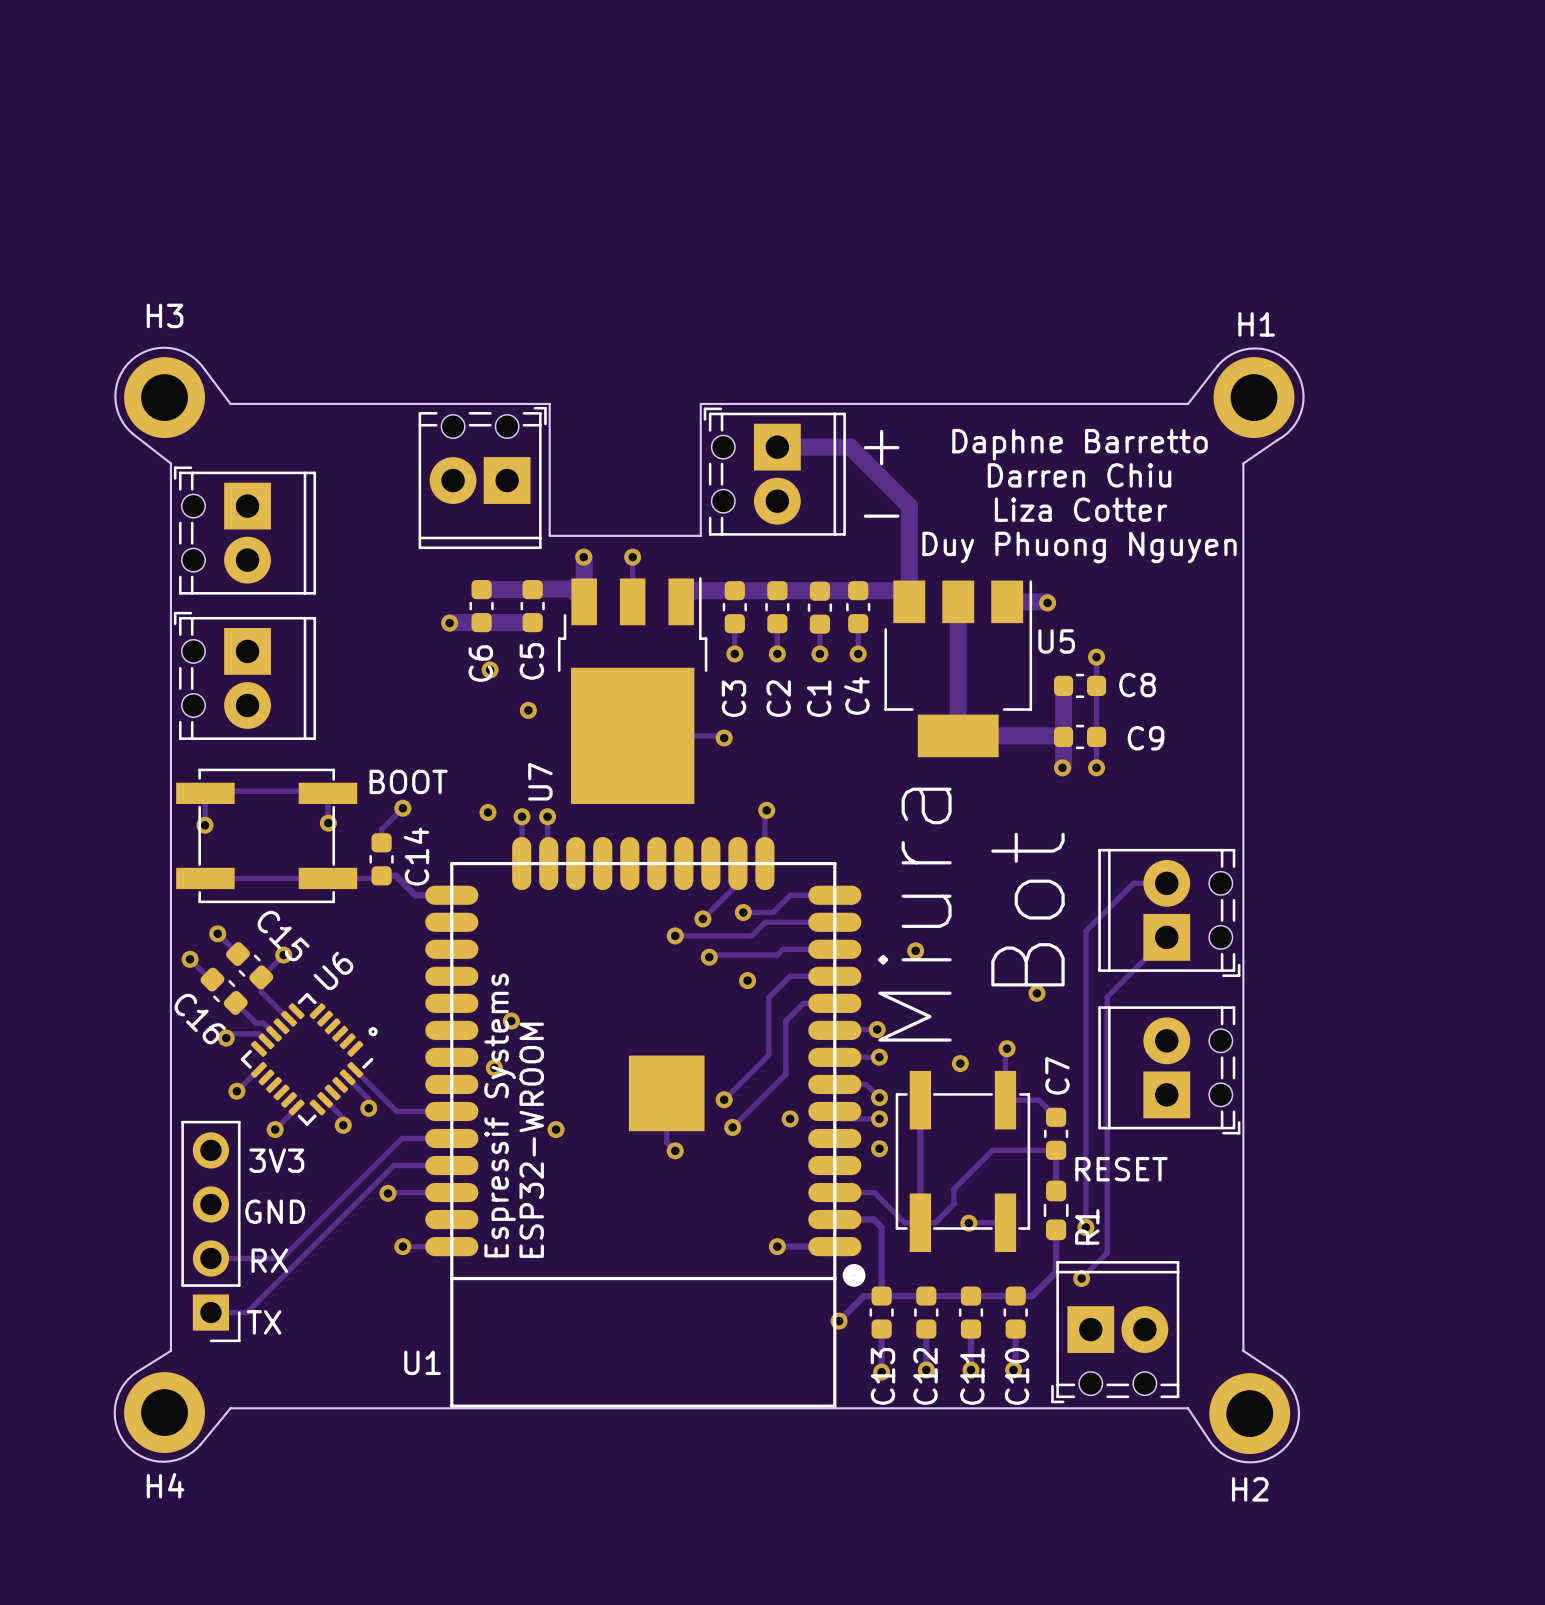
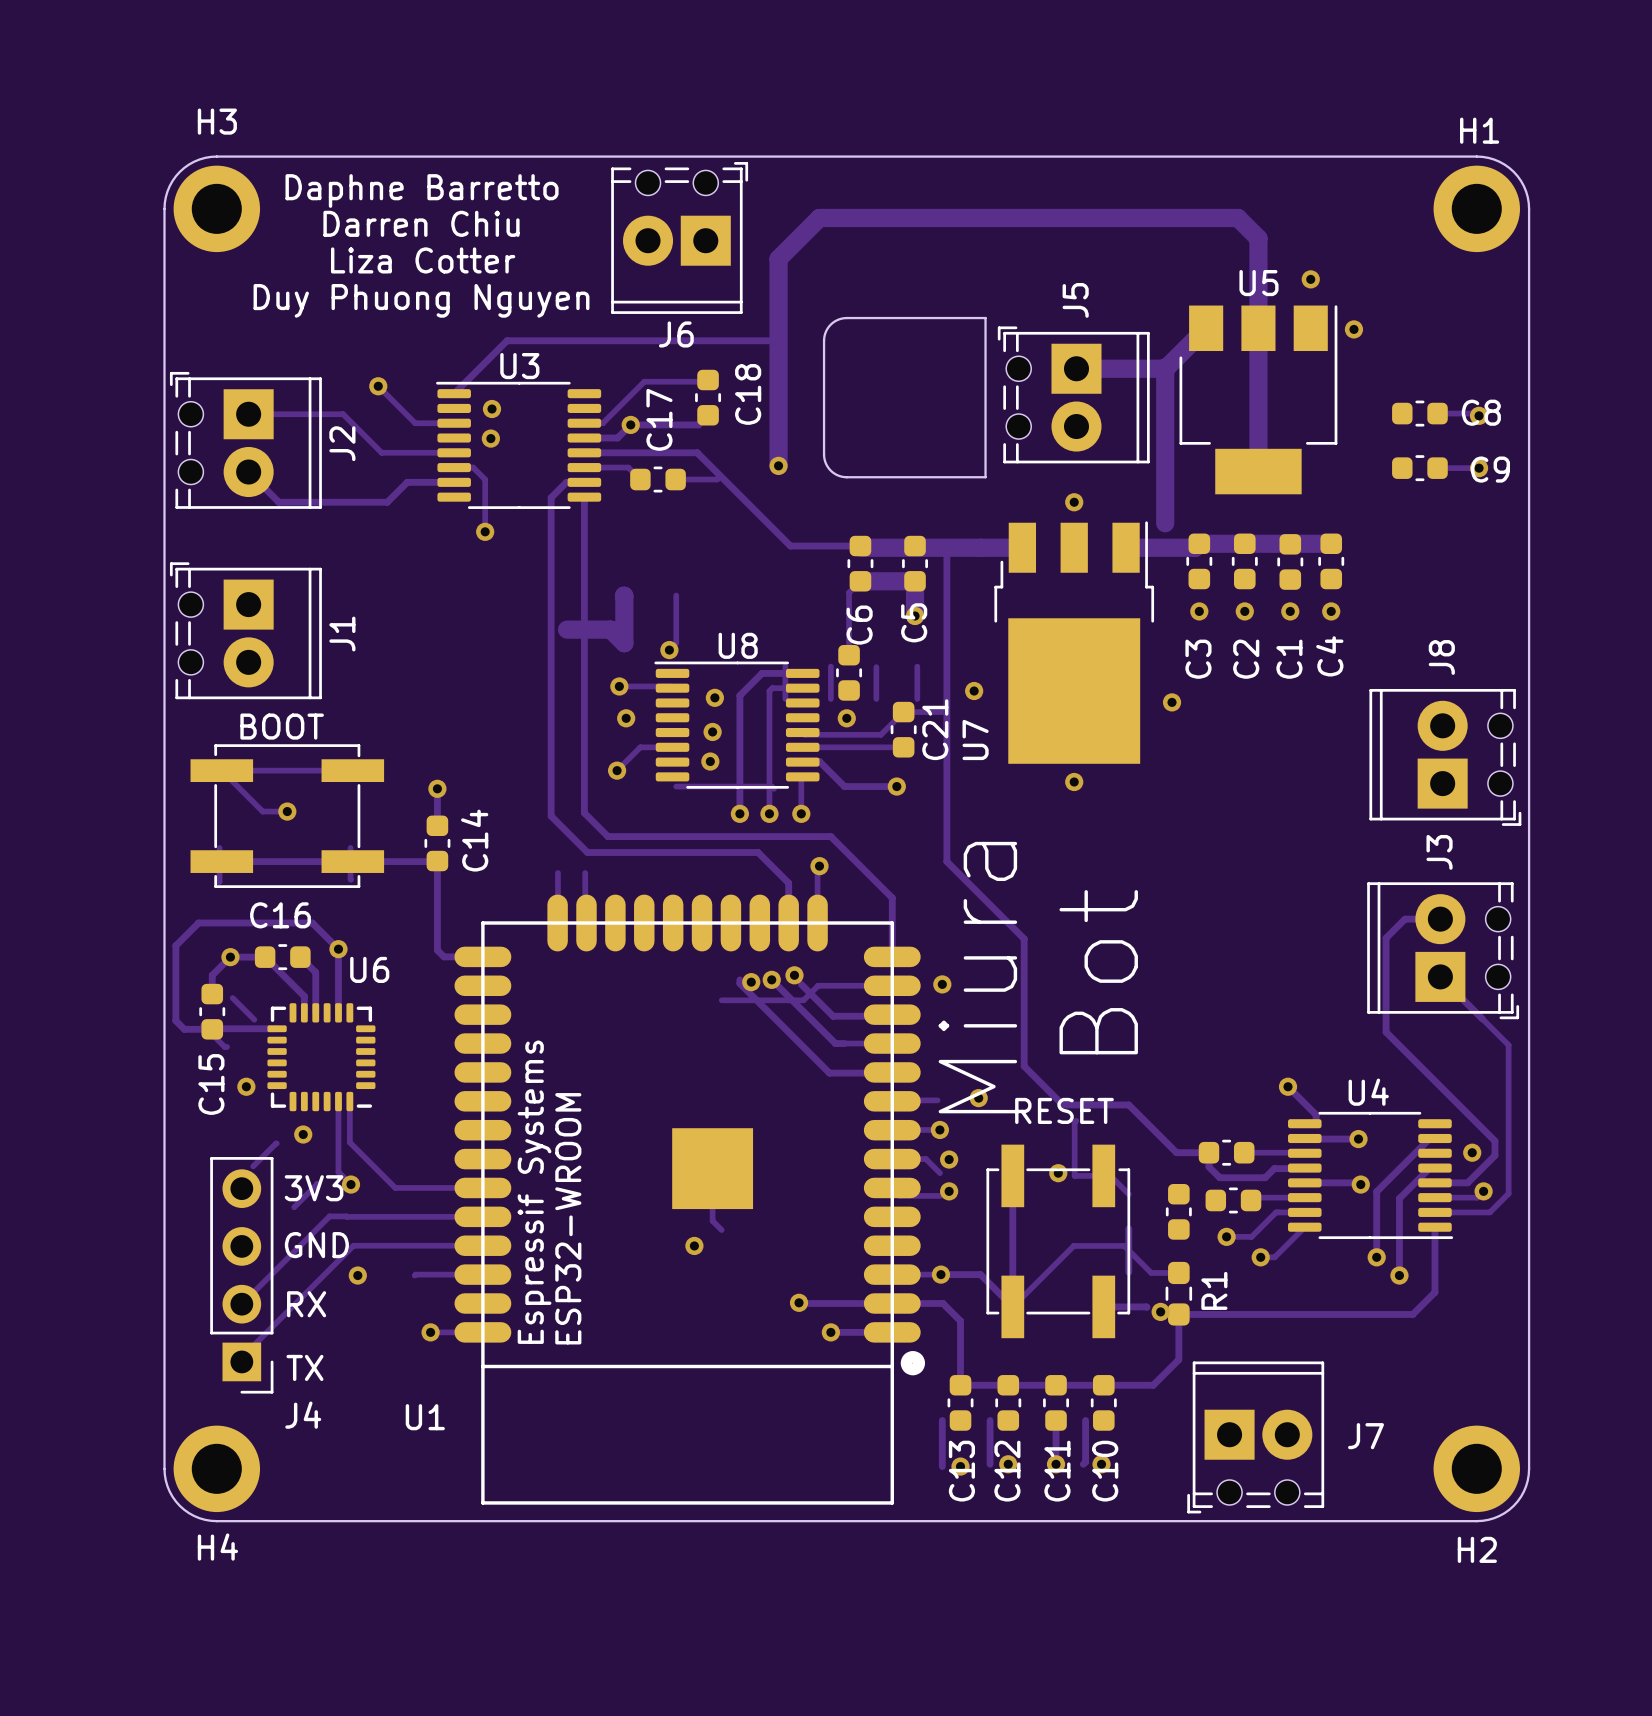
text: none -> Daphne Barretto (422, 191)
text: none -> Darren Chiu (421, 223)
J6: none -> (679, 237)
text: none -> Liza Cotter (423, 260)
via: none -> (1310, 279)
text: none -> Duy Phuong Nguyen (421, 300)
board edge: none -> (846, 318) (985, 318) (985, 477) (846, 477) (836, 474) (829, 468) (824, 454) (824, 338) (830, 324) (836, 320) (846, 318)
track: none -> (1206, 328) (1165, 368) (1076, 368)
via: none -> (1353, 329)
track: none -> (778, 343) (776, 340) (507, 340) (454, 393)
track: none -> (1165, 367) (1165, 523)
track: none -> (708, 380) (706, 381) (644, 381) (602, 423) (584, 423)
track: none -> (378, 386) (415, 423) (454, 423)
via: none -> (378, 386)
board edge: (1217, 365) (1188, 403) (700, 403) (700, 535) (549, 535) (549, 403) (230, 403) (201, 365) (182, 351) (158, 348) (147, 350) (131, 359) (123, 368) (116, 385) (115, 402) (118, 414) (132, 433) (170, 463) (170, 1350) (132, 1375) (118, 1394) (114, 1418) (120, 1435) (126, 1445) (135, 1453) (152, 1460) (169, 1461) (181, 1458) (196, 1448) (230, 1408) (1188, 1408) (1212, 1445) (1232, 1458) (1243, 1461) (1261, 1461) (1282, 1450) (1290, 1441) (1297, 1424) (1298, 1413) (1295, 1395) (1281, 1376) (1243, 1350) (1243, 463) (1291, 428) (1300, 412) (1303, 394) (1299, 377) (1292, 366) (1284, 358) (1273, 352) (1255, 348) (1243, 349) (1232, 354) (1217, 365) -> (216, 156) (199, 159) (179, 171) (167, 191) (164, 208) (164, 1468) (167, 1486) (179, 1505) (194, 1515) (216, 1521) (1476, 1521) (1494, 1518) (1513, 1505) (1526, 1486) (1529, 1468) (1529, 208) (1523, 186) (1513, 171) (1494, 159) (1476, 156) (216, 156)
J5: none -> (1073, 394)
C18: none -> (708, 397)
via: none -> (492, 409)
track: none -> (1439, 413) (1476, 413) (1479, 415)
track: none -> (248, 414) (343, 414) (381, 452) (454, 452)
track: none -> (708, 415) (698, 424) (630, 424) (617, 438) (584, 438)
via: none -> (1479, 415)
H3 position: (164, 397) -> (216, 208)
via: none -> (630, 424)
H1 position: (1254, 397) -> (1476, 208)
via: none -> (490, 438)
J2: none -> (245, 440)
U3: none -> (518, 445)
track: none -> (584, 452) (697, 452) (790, 546) (860, 546)
track: none -> (778, 465) (778, 258) (819, 217) (1237, 217) (1258, 238) (1258, 471)
via: none -> (778, 465)
track: none -> (454, 467) (473, 467) (485, 479) (485, 531)
track: none -> (584, 467) (628, 467) (640, 479)
track: none -> (1437, 468) (1479, 468)
via: none -> (1479, 468)
track: none -> (248, 472) (278, 502) (387, 502) (407, 482) (453, 481)
text: Daphne Barretto (1080, 444) -> none
track: none -> (720, 476) (717, 479) (675, 479)
track: (777, 447) (850, 447) (909, 506) (909, 601) (898, 590) (692, 590) (681, 601) -> none
text: + (881, 447) -> none
C17: none -> (658, 479)
via: none -> (1074, 502)
part: (774, 471) -> none
text: Darren Chiu (1079, 475) -> none
part: (482, 478) -> none
via: none -> (485, 531)
track: none -> (1331, 543) (1199, 543) (1195, 547) (1126, 547)
text: Liza Cotter (1081, 509) -> none
track: none -> (860, 546) (862, 547) (1022, 547)
track: none -> (946, 547) (940, 547) (946, 554) (946, 861) (1024, 938) (1024, 1066) (1062, 1104) (1128, 1104) (1176, 1152) (1208, 1152) (1208, 1166) (1219, 1177) (1265, 1177) (1274, 1168) (1304, 1168)
text: - (881, 516) -> none
part: (244, 530) -> none
text: Duy Phuong Nguyen (1079, 547) -> none
via: (583, 557) -> none
via: (632, 557) -> none
via: none -> (1199, 611)
via: none -> (1244, 611)
via: none -> (1290, 611)
via: none -> (1331, 611)
track: none -> (915, 615) (915, 581) (860, 581) (849, 592) (849, 655)
via: none -> (915, 615)
track: (481, 589) (532, 589) -> none
J1: none -> (245, 630)
track: (958, 601) (958, 735) (1063, 736) -> none
via: (1047, 602) -> none
C6 position: (481, 606) -> (860, 563)
C5 position: (532, 606) -> (915, 563)
C3 position: (734, 607) -> (1199, 561)
C2 position: (777, 607) -> (1244, 561)
C1 position: (819, 607) -> (1290, 561)
C4 position: (858, 607) -> (1331, 561)
via: none -> (669, 650)
track: (532, 622) (449, 623) -> none
via: (449, 623) -> none
part: none -> (849, 672)
track: none -> (802, 673) (762, 673) (739, 695) (739, 813)
U5 name position: U5 (1056, 641) -> U5 (1258, 283)
track: none -> (619, 686) (670, 686) (672, 688)
via: none -> (619, 686)
track: none -> (802, 688) (772, 688) (769, 691) (769, 813)
via: none -> (974, 691)
via: none -> (714, 697)
via: (734, 653) -> none
via: (777, 653) -> none
via: (819, 653) -> none
via: (858, 653) -> none
track: (1096, 657) (1096, 767) -> none
track: none -> (946, 711) (903, 712) (880, 734) (805, 734) (802, 732)
U5 position: (958, 668) -> (1258, 399)
via: (490, 669) -> none
via: none -> (626, 718)
via: none -> (846, 718)
part: (244, 675) -> none
U8: none -> (736, 725)
C21: none -> (903, 729)
via: none -> (712, 731)
track: (1063, 685) (1062, 767) -> none
C8 position: (1080, 685) -> (1419, 413)
U7 position: (632, 690) -> (1074, 642)
track: none -> (672, 747) (640, 747) (617, 770)
track: none -> (802, 747) (903, 747)
J8: none -> (1445, 757)
via: (528, 710) -> none
via: none -> (710, 761)
track: none -> (802, 762) (819, 761) (844, 786) (896, 786)
track: none -> (352, 770) (221, 770) (262, 811) (287, 811)
via: none -> (617, 770)
track: none -> (802, 776) (801, 813)
via: none -> (1074, 782)
via: none -> (896, 786)
C9 position: (1080, 736) -> (1419, 468)
track: none -> (437, 788) (437, 825)
via: none -> (437, 788)
via: (724, 738) -> none
via: none -> (287, 811)
via: none -> (739, 813)
via: none -> (769, 813)
via: none -> (801, 813)
via: (1062, 767) -> none
via: (1096, 767) -> none
text position: BOOT (408, 781) -> BOOT (282, 726)
track: (205, 791) (327, 791) -> none
track: (402, 808) (381, 829) (381, 842) -> none
via: (402, 808) -> none
via: (487, 812) -> none
via: (522, 816) -> none
via: (547, 816) -> none
via: (328, 823) -> none
via: (204, 825) -> none
part position: (266, 835) -> (287, 816)
C14 position: (381, 859) -> (437, 843)
track: none -> (1440, 919) (1405, 919) (1386, 938) (1386, 1032) (1494, 1141) (1494, 1155) (1467, 1182) (1446, 1182)
track: (737, 863) (737, 883) (702, 918) -> (788, 923) (788, 883) (758, 852) (587, 852) (551, 816) (551, 497) (566, 482) (584, 482)
track: (381, 875) (395, 875) (409, 889) -> (221, 861) (437, 861) (437, 950)
track: (205, 878) (372, 878) -> none
track: (1166, 883) (1133, 883) (1085, 931) (1085, 1227) -> none
via: none -> (338, 949)
J3: none -> (1443, 950)
via: none -> (230, 957)
track: none -> (300, 957) (315, 972) (315, 1012)
track: (834, 895) (790, 895) (773, 912) (743, 912) -> (892, 956) (892, 897) (830, 836) (607, 836) (584, 812) (584, 497)
part: (1169, 912) -> none
via: none -> (771, 979)
via: none -> (942, 984)
track: none -> (212, 994) (212, 975) (230, 957) (265, 957) (304, 996) (304, 1012)
via: (217, 933) -> none
via: (675, 935) -> none
C15 name position: C15 (283, 936) -> C15 (211, 1084)
track: (1166, 937) (1107, 996) (1107, 1252) (1081, 1278) -> none
track: none -> (338, 1012) (338, 949) (312, 923) (198, 923) (175, 945) (175, 1020) (184, 1029) (277, 1028)
track: (834, 949) (783, 949) (777, 955) (711, 955) (709, 957) -> (892, 1014) (890, 1016) (833, 1016) (801, 984)
via: (915, 950) -> none
track: none -> (1482, 1018) (1440, 976) (1508, 1045) (1508, 1193) (1489, 1212) (1434, 1212)
track: (283, 955) (261, 977) (261, 991) (289, 1018) -> none
via: (283, 955) -> none
via: (709, 957) -> none
via: (190, 959) -> none
C15 rotation: 0° (249, 965) -> 45° clockwise (212, 1011)
C15 position: (249, 965) -> (212, 1011)
track: (790, 976) (768, 997) (768, 1055) (724, 1099) -> (844, 1043) (835, 1043) (771, 979)
via: (747, 980) -> none
C16 rotation: 0° (224, 991) -> 45° counterclockwise (282, 957)
C16 position: (224, 991) -> (282, 957)
via: (1036, 993) -> none
track: (235, 1002) (256, 1023) (263, 1023) (274, 1033) -> none
track: (834, 1003) (803, 1003) (785, 1021) (785, 1074) (732, 1127) -> (892, 1072) (829, 1073) (739, 983) (739, 979)
track: none -> (1288, 1086) (1316, 1114) (1316, 1123)
via: none -> (1288, 1086)
C16 name position: C16 (200, 1019) -> C16 (280, 915)
via: (511, 1021) -> none
drawing: [368, 1027, 378, 1037] -> none
via: none -> (978, 1098)
via: (877, 1029) -> none
track: none -> (338, 1101) (338, 1172) (350, 1184)
track: (226, 1038) (230, 1033) (259, 1033) (266, 1041) -> none
via position: (226, 1038) -> (246, 1086)
via: (1007, 1048) -> none
U6 rotation: 0° (307, 1059) -> 45° clockwise (321, 1057)
via: none -> (303, 1134)
via: (960, 1063) -> none
track: none -> (1316, 1138) (1358, 1139)
via: none -> (1358, 1139)
track: none -> (1446, 1138) (1429, 1138) (1376, 1191) (1376, 1257)
via: (494, 1067) -> none
track: (355, 1069) (396, 1111) -> (349, 1101) (349, 1142) (395, 1187) (424, 1187)
part: (1169, 1070) -> none
track: (347, 1077) (368, 1099) (368, 1108) -> none
part: none -> (1226, 1152)
track: none -> (1244, 1152) (1304, 1153)
via: none -> (1472, 1152)
via: none -> (949, 1159)
via: (236, 1091) -> none
track: none -> (1446, 1168) (1429, 1168) (1399, 1198) (1399, 1275)
via: (879, 1097) -> none
via: none -> (1058, 1173)
track: (325, 1099) (343, 1118) (343, 1125) -> none
via: (724, 1099) -> none
U4: none -> (1370, 1175)
track: (920, 1100) (920, 1222) -> (1012, 1175) (1012, 1306)
track: none -> (1316, 1182) (1359, 1182) (1360, 1184)
via: none -> (350, 1184)
via: (368, 1108) -> none
via: none -> (1360, 1184)
via: none -> (949, 1191)
track: none -> (1483, 1191) (1477, 1197) (1434, 1197)
via: none -> (1483, 1191)
via: (790, 1118) -> none
via: (879, 1118) -> none
track: none -> (1304, 1197) (1256, 1197) (1251, 1202)
part: none -> (1233, 1200)
via: (343, 1125) -> none
via: (732, 1127) -> none
via: (275, 1129) -> none
via: (556, 1129) -> none
C7: (1056, 1133) -> none
part: none -> (1178, 1211)
track: none -> (1304, 1212) (1276, 1212) (1251, 1236) (1226, 1236)
track: (402, 1138) (282, 1258) (210, 1258) -> (429, 1216) (329, 1216) (241, 1304)
via: (879, 1148) -> none
track: none -> (1304, 1227) (1274, 1257) (1260, 1257)
via position: (675, 1150) -> (694, 1245)
track: (1056, 1150) (992, 1150) (953, 1189) (953, 1204) (935, 1222) (904, 1222) (874, 1192) -> (1012, 1306) (980, 1274) (934, 1274)
via: none -> (1226, 1236)
text position: 3V3 (276, 1160) -> 3V3 (314, 1188)
part position: (962, 1161) -> (1058, 1241)
track: (394, 1165) (246, 1312) (210, 1312) -> (421, 1245) (353, 1245) (241, 1357) (241, 1361)
text position: RESET (1121, 1169) -> RESET (1064, 1110)
via: none -> (1260, 1257)
via: none -> (1376, 1257)
track: none -> (1178, 1272) (1151, 1272) (1124, 1245) (1073, 1245) (1012, 1306)
via: none -> (940, 1274)
J4: none -> (241, 1275)
via: none -> (357, 1275)
via: (387, 1193) -> none
via: none -> (1399, 1275)
R1 position: (1056, 1210) -> (1178, 1293)
text position: GND (275, 1211) -> GND (316, 1245)
track: none -> (799, 1302) (892, 1303)
via: none -> (799, 1302)
track: (873, 1219) (881, 1227) (881, 1296) -> (933, 1303) (943, 1303) (960, 1321) (960, 1385)
track: (1005, 1222) (968, 1223) -> none
track: none -> (1103, 1306) (1147, 1307)
via: (968, 1223) -> none
R1 name position: R1 (1087, 1226) -> R1 (1214, 1290)
track: (1056, 1229) (1056, 1272) (1032, 1296) -> (1434, 1227) (1434, 1292) (1412, 1314) (1178, 1314) (1178, 1359) (1153, 1385) (1103, 1385)
part: (210, 1231) -> none
text position: RX (269, 1260) -> RX (306, 1304)
via: (1081, 1278) -> none
track: (898, 1296) (864, 1296) (839, 1321) -> none
C13 position: (881, 1312) -> (960, 1402)
C12 position: (926, 1312) -> (1008, 1402)
C11 position: (971, 1312) -> (1056, 1402)
C10 position: (1015, 1312) -> (1103, 1402)
via: (839, 1321) -> none
text position: TX (264, 1322) -> TX (304, 1367)
track: (971, 1329) (971, 1370) -> (1056, 1420) (1056, 1464)
part: (1115, 1332) -> none
J7: none -> (1255, 1437)
U1 name position: U1 (422, 1362) -> U1 (425, 1417)
via position: (926, 1370) -> (1008, 1464)
via position: (971, 1370) -> (1056, 1464)
via position: (1013, 1370) -> (1101, 1464)
via position: (881, 1372) -> (960, 1466)
H4 position: (164, 1412) -> (216, 1468)
H2 position: (1249, 1413) -> (1476, 1468)

